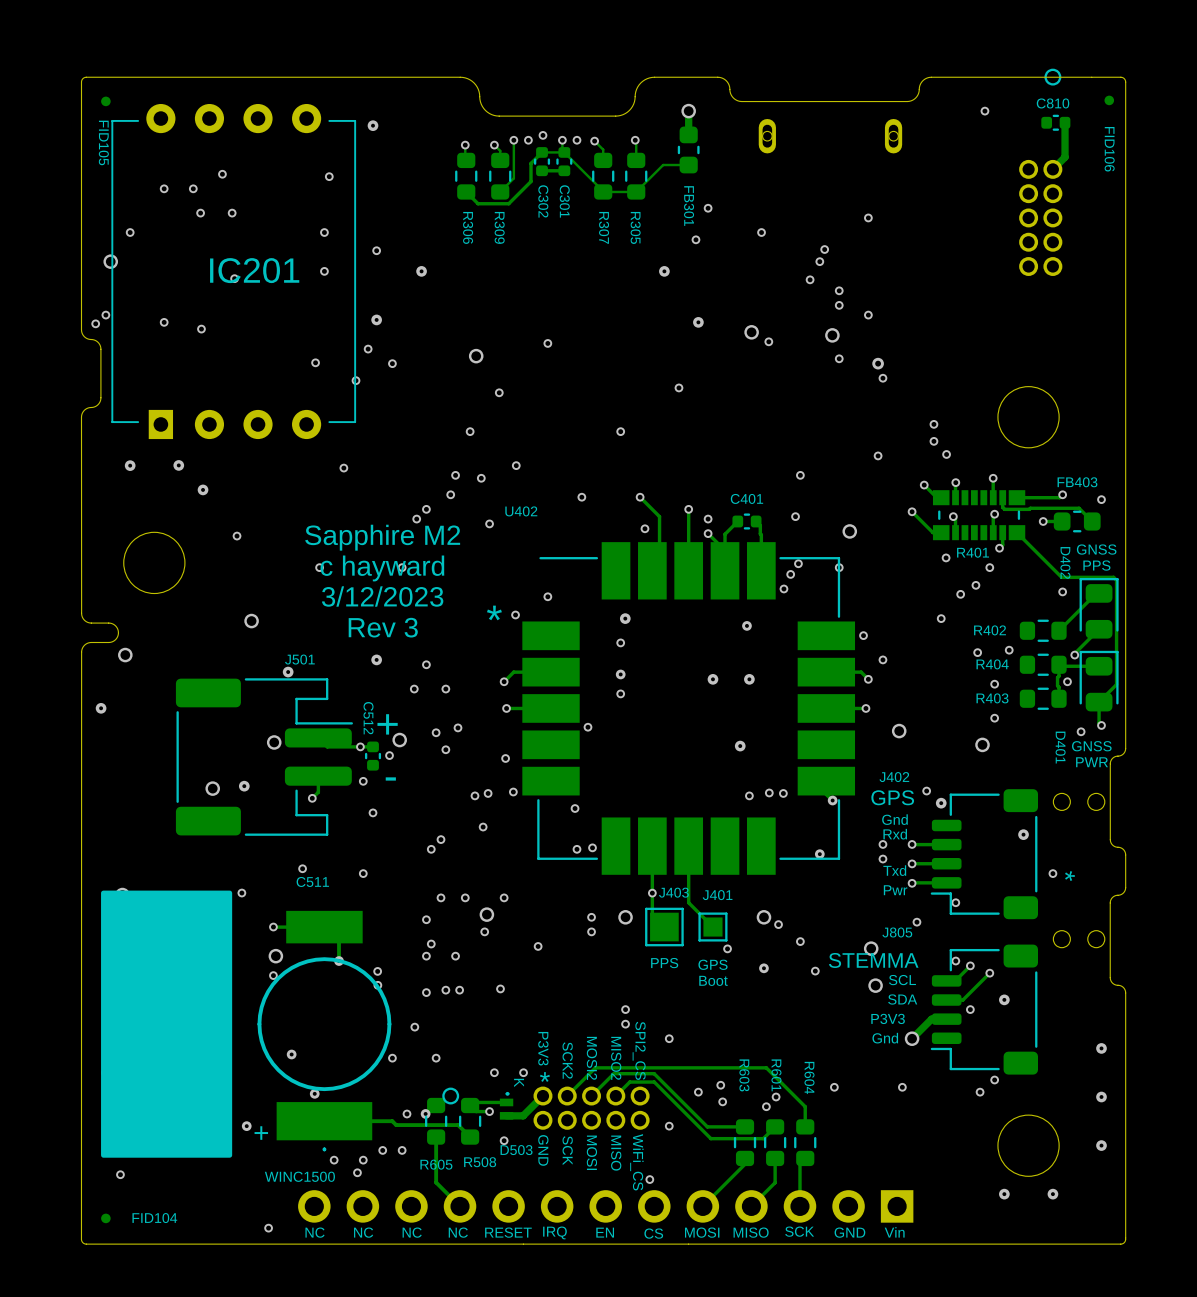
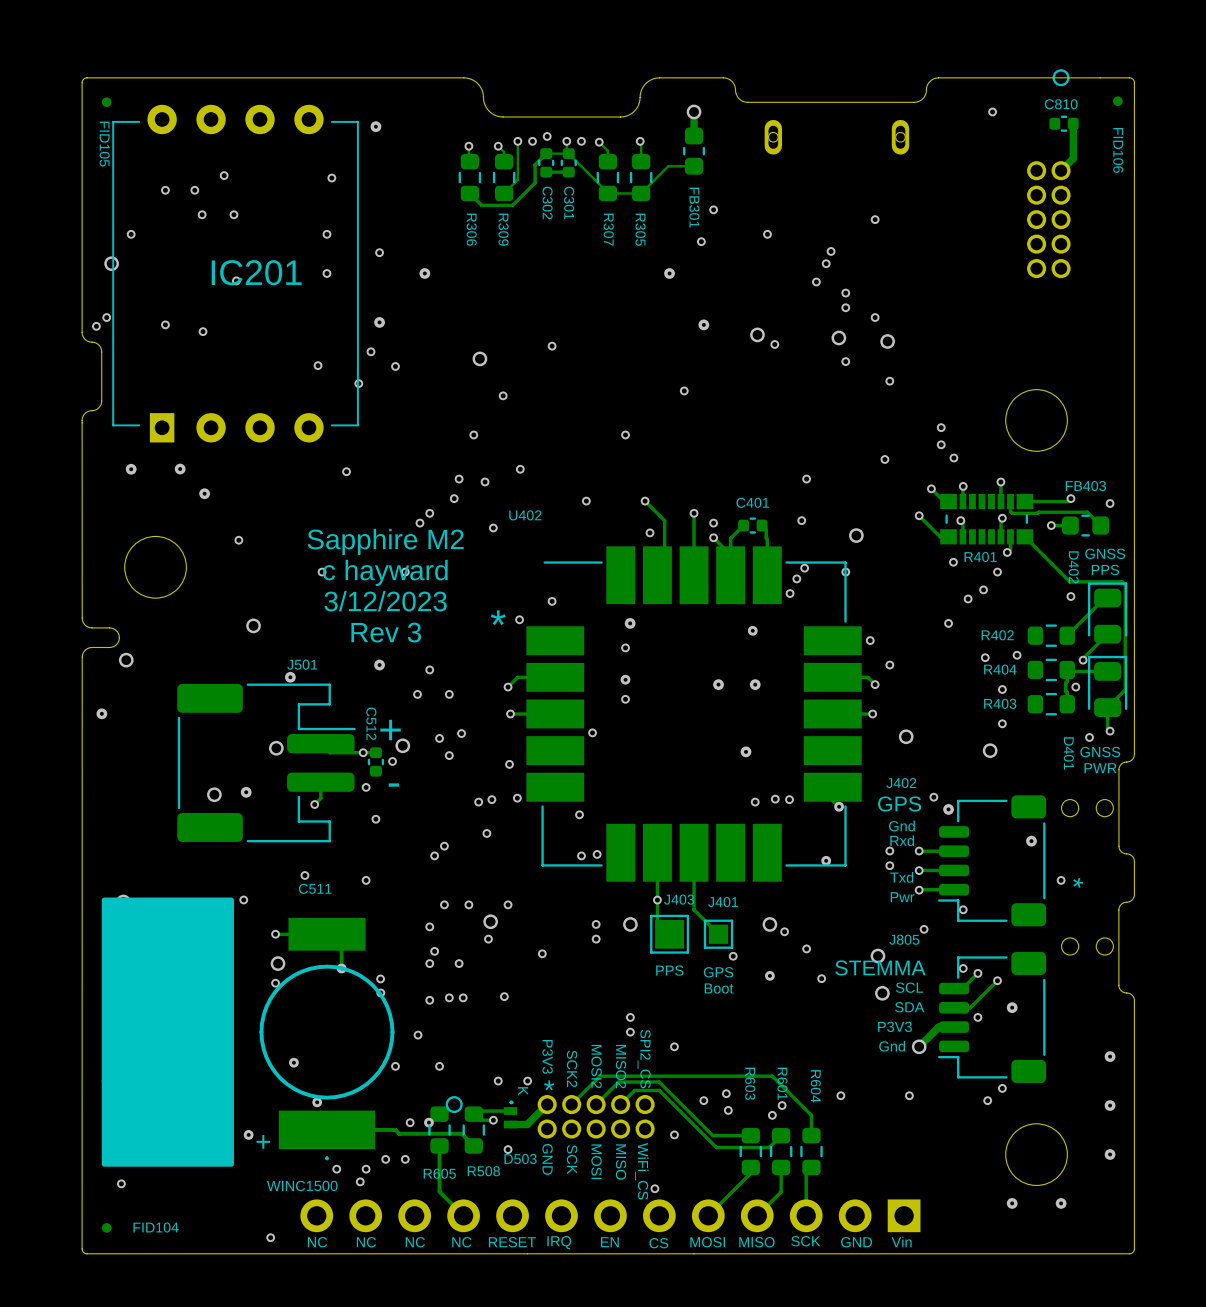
via: none -> (887, 341)
via: (878, 363) -> none

